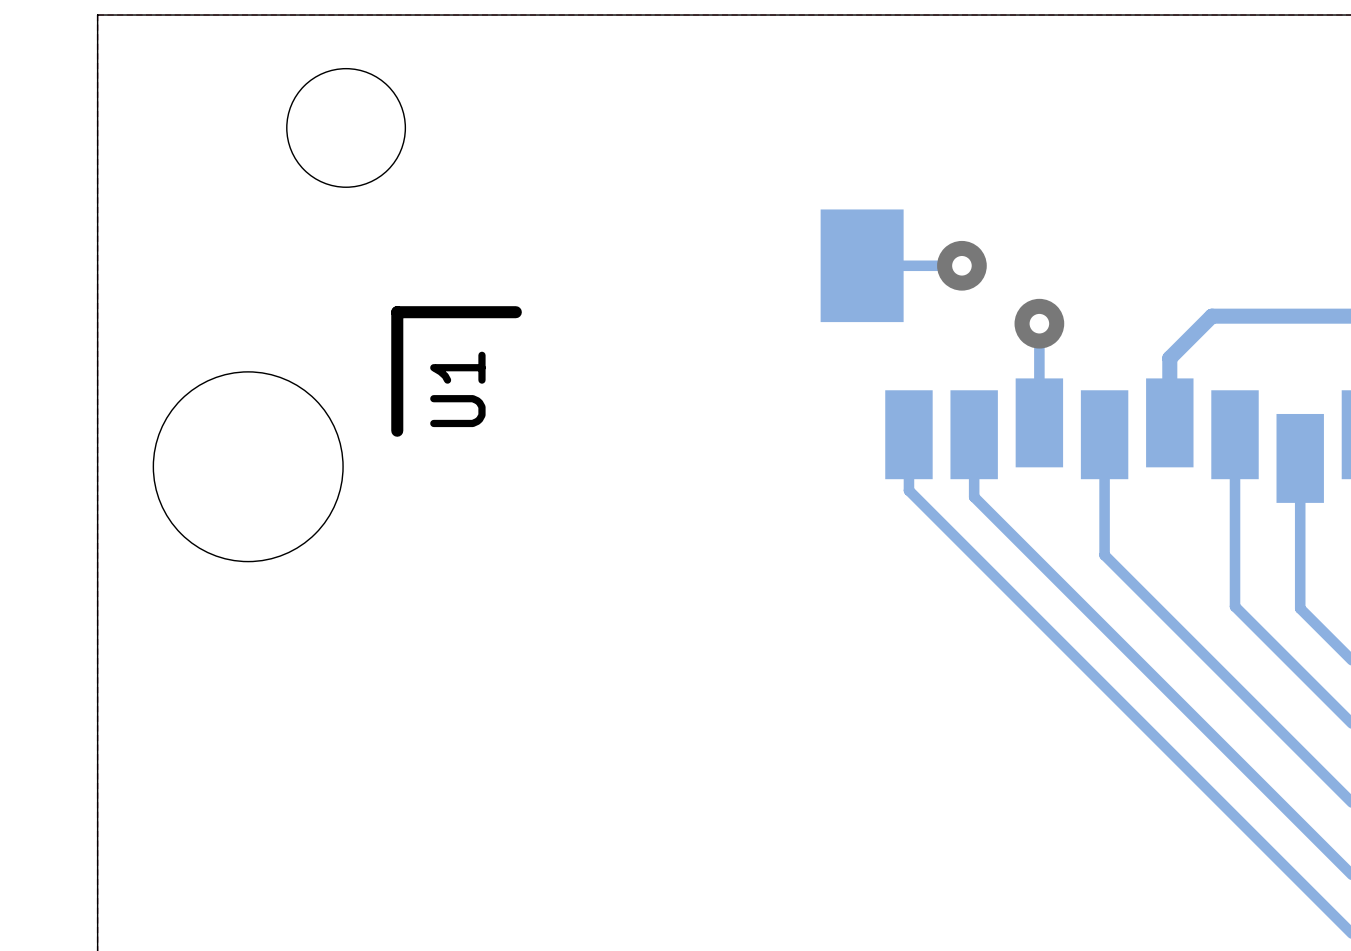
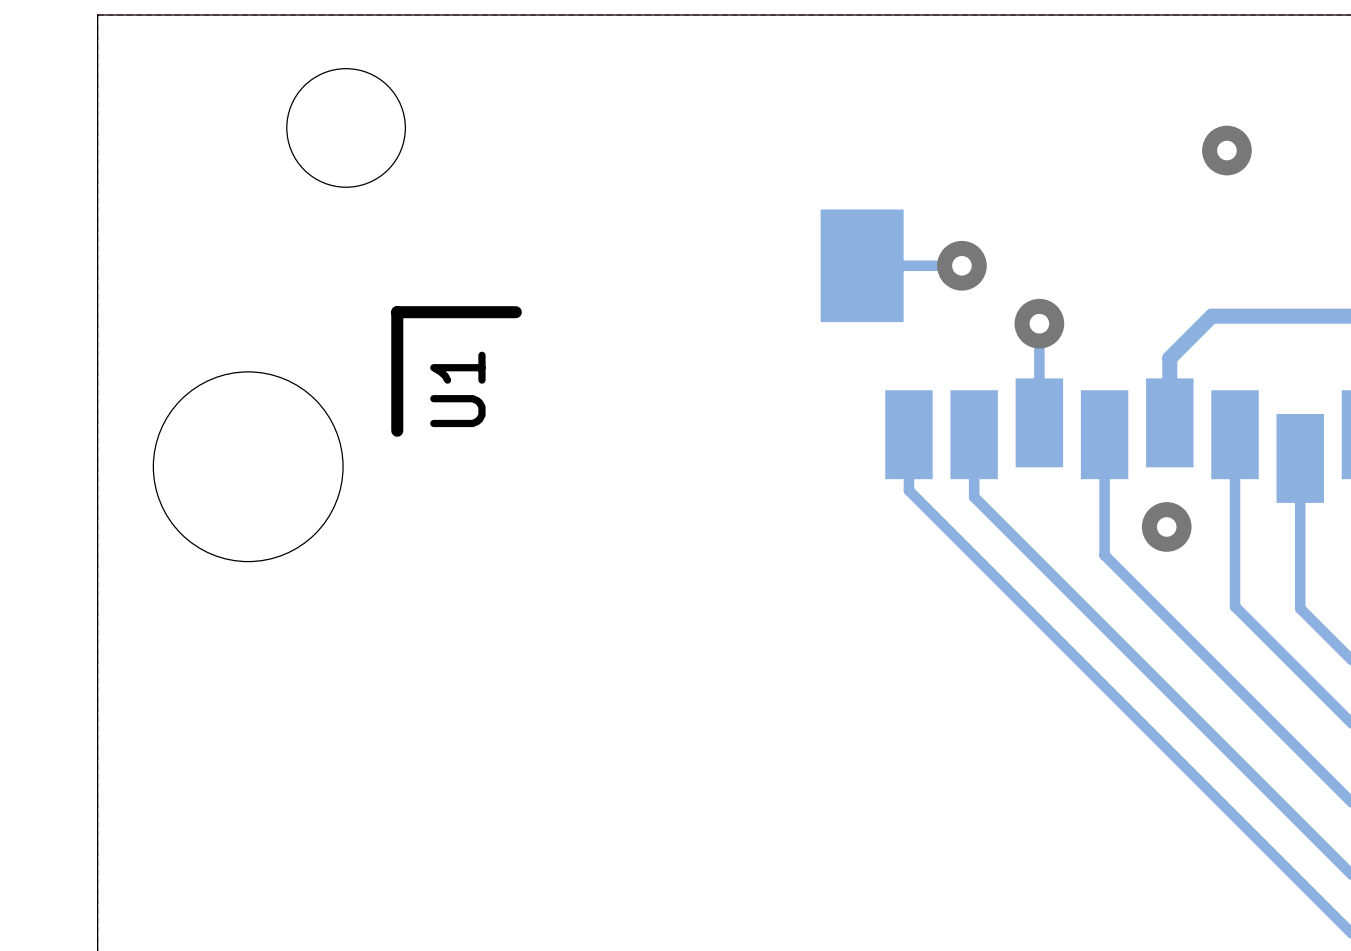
via: none -> (1226, 150)
via: none -> (1166, 526)

